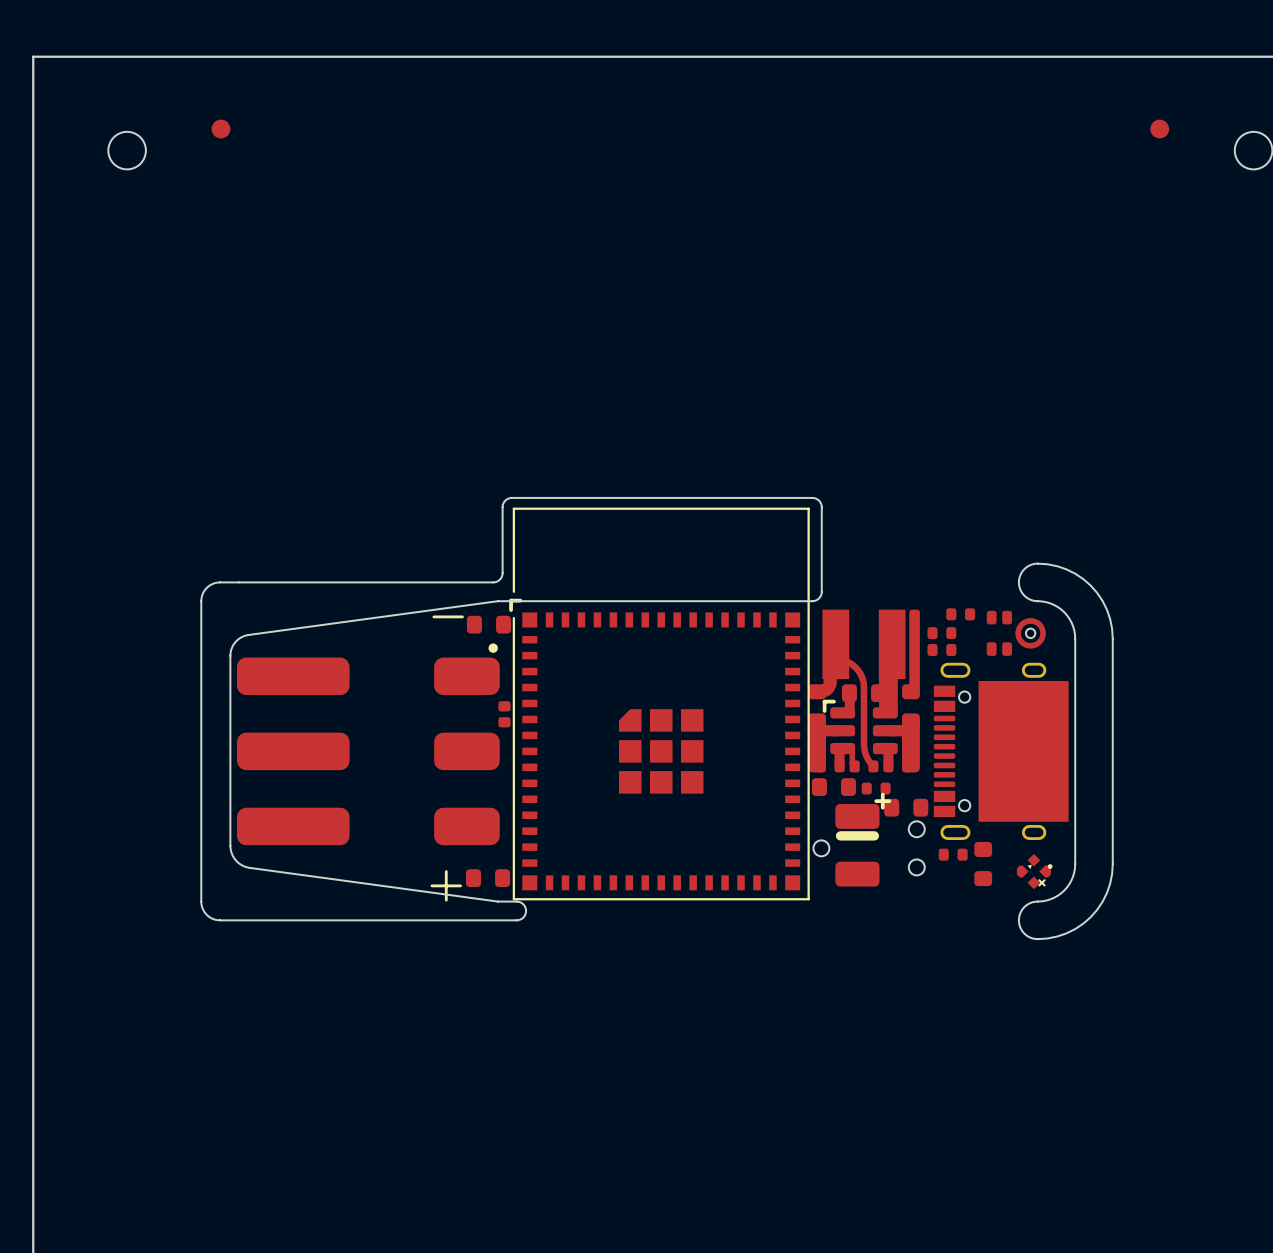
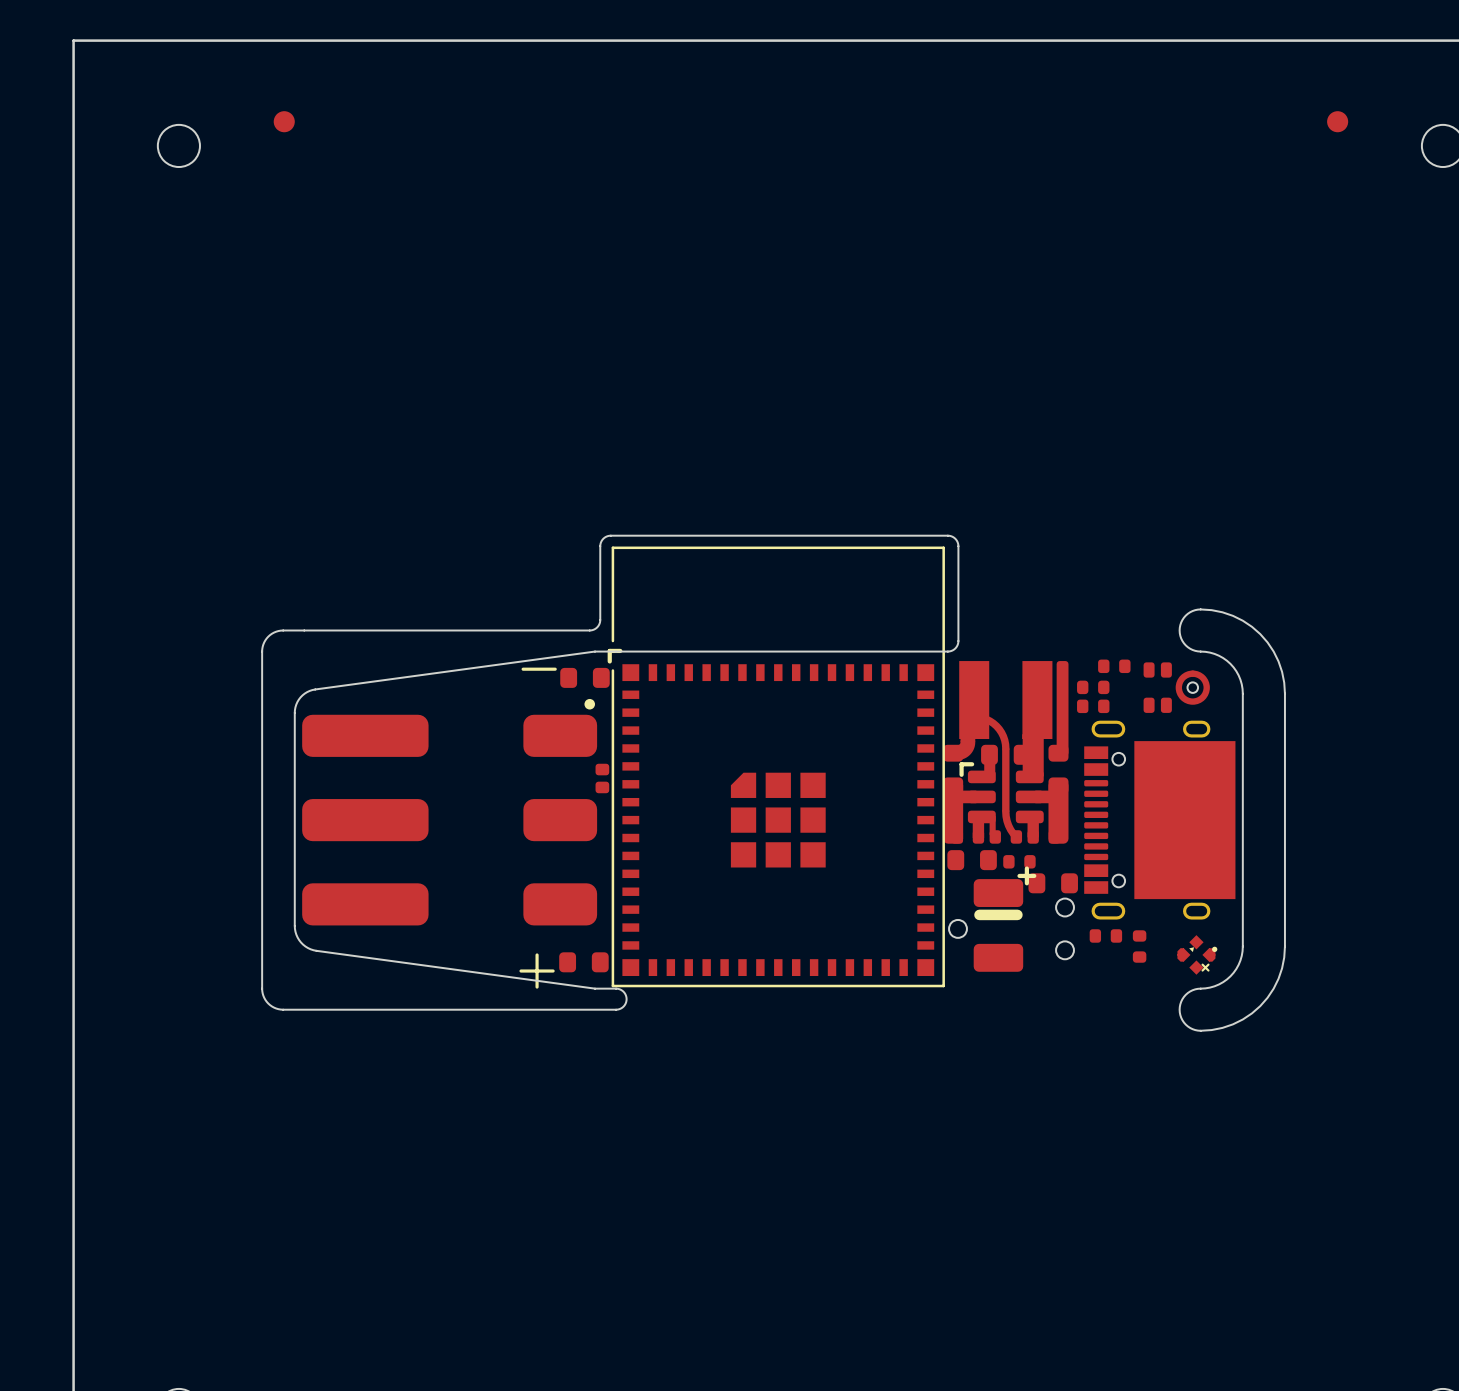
part footprint: [974, 841, 993, 887] -> [1132, 930, 1147, 963]

